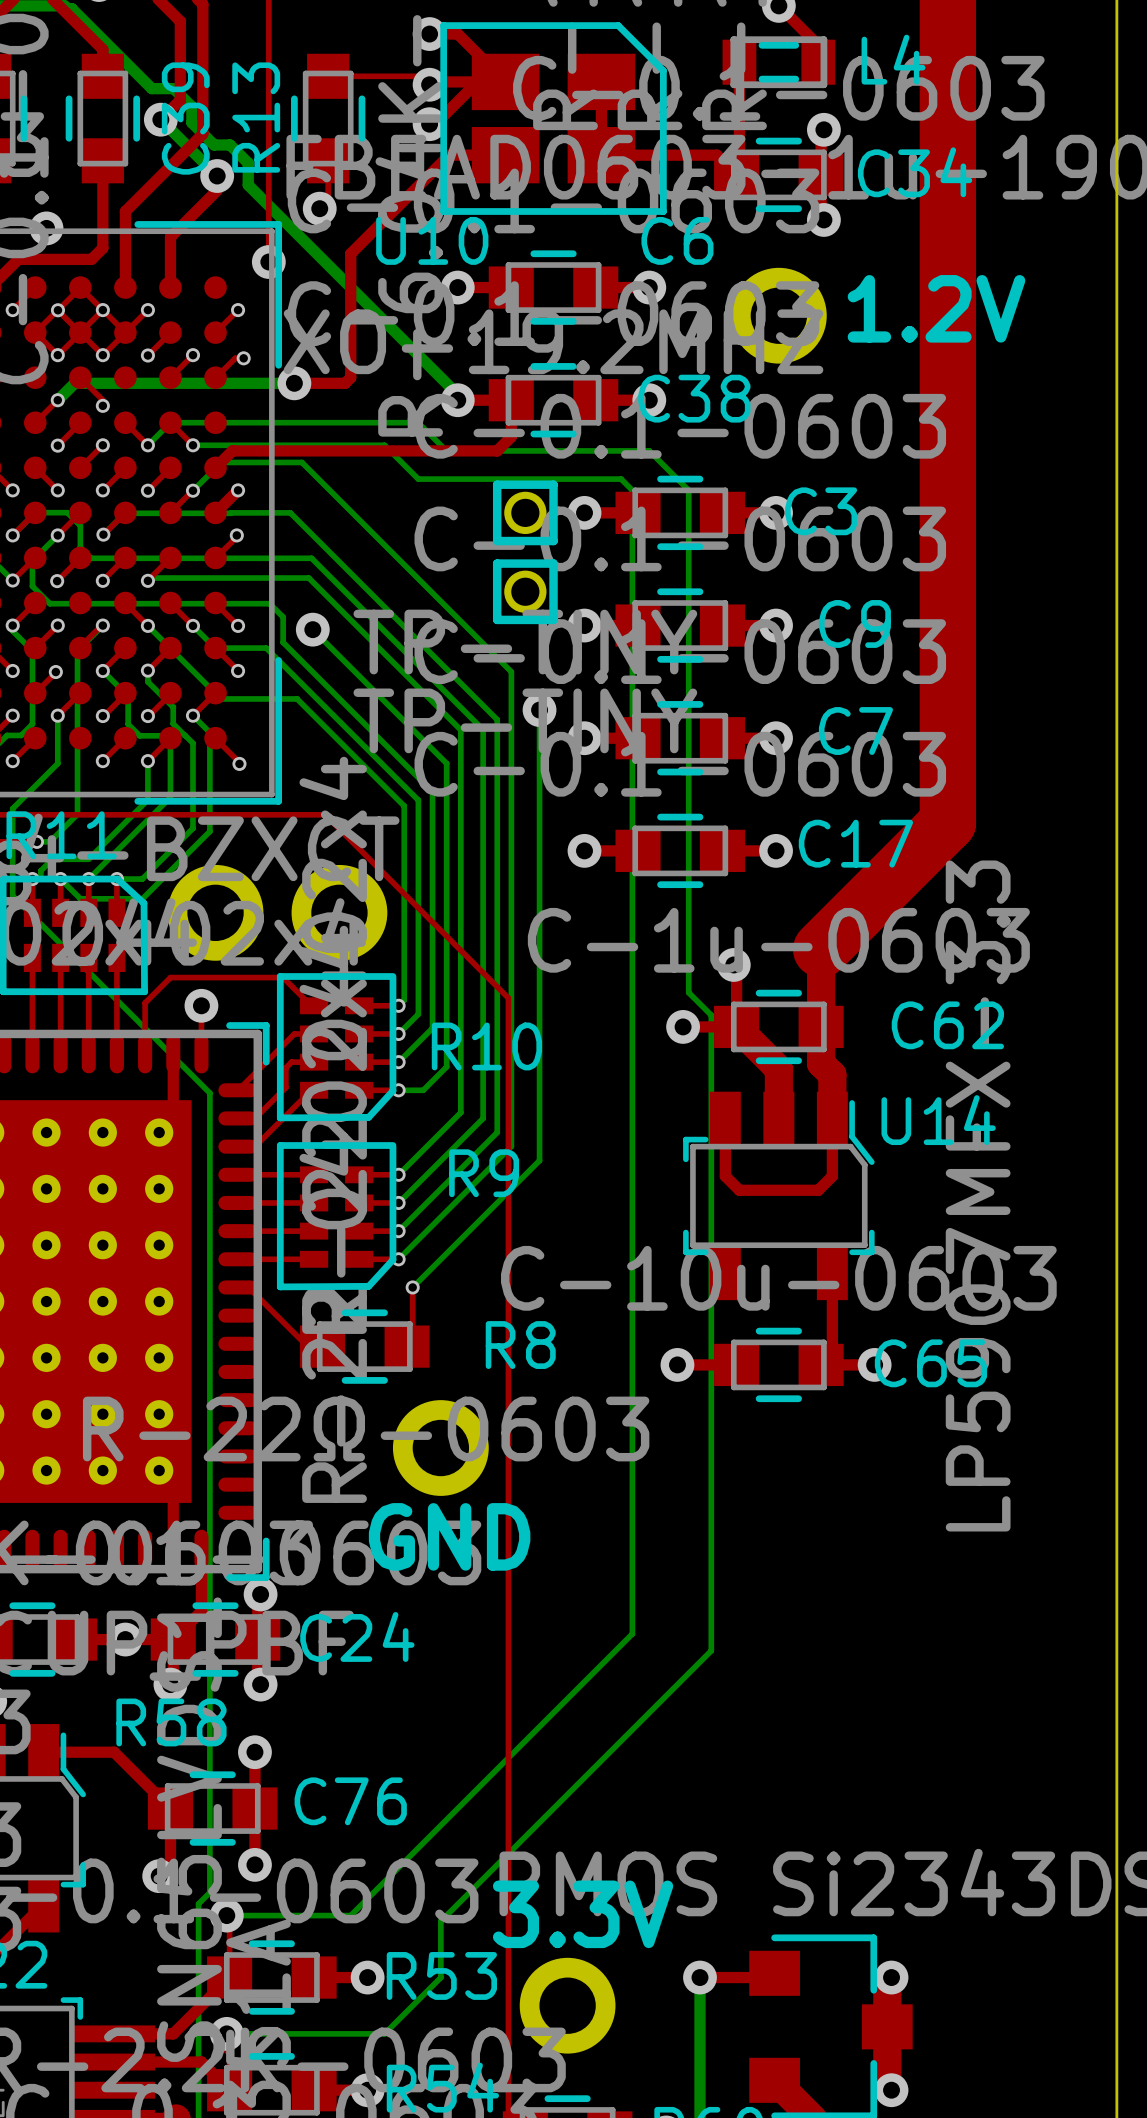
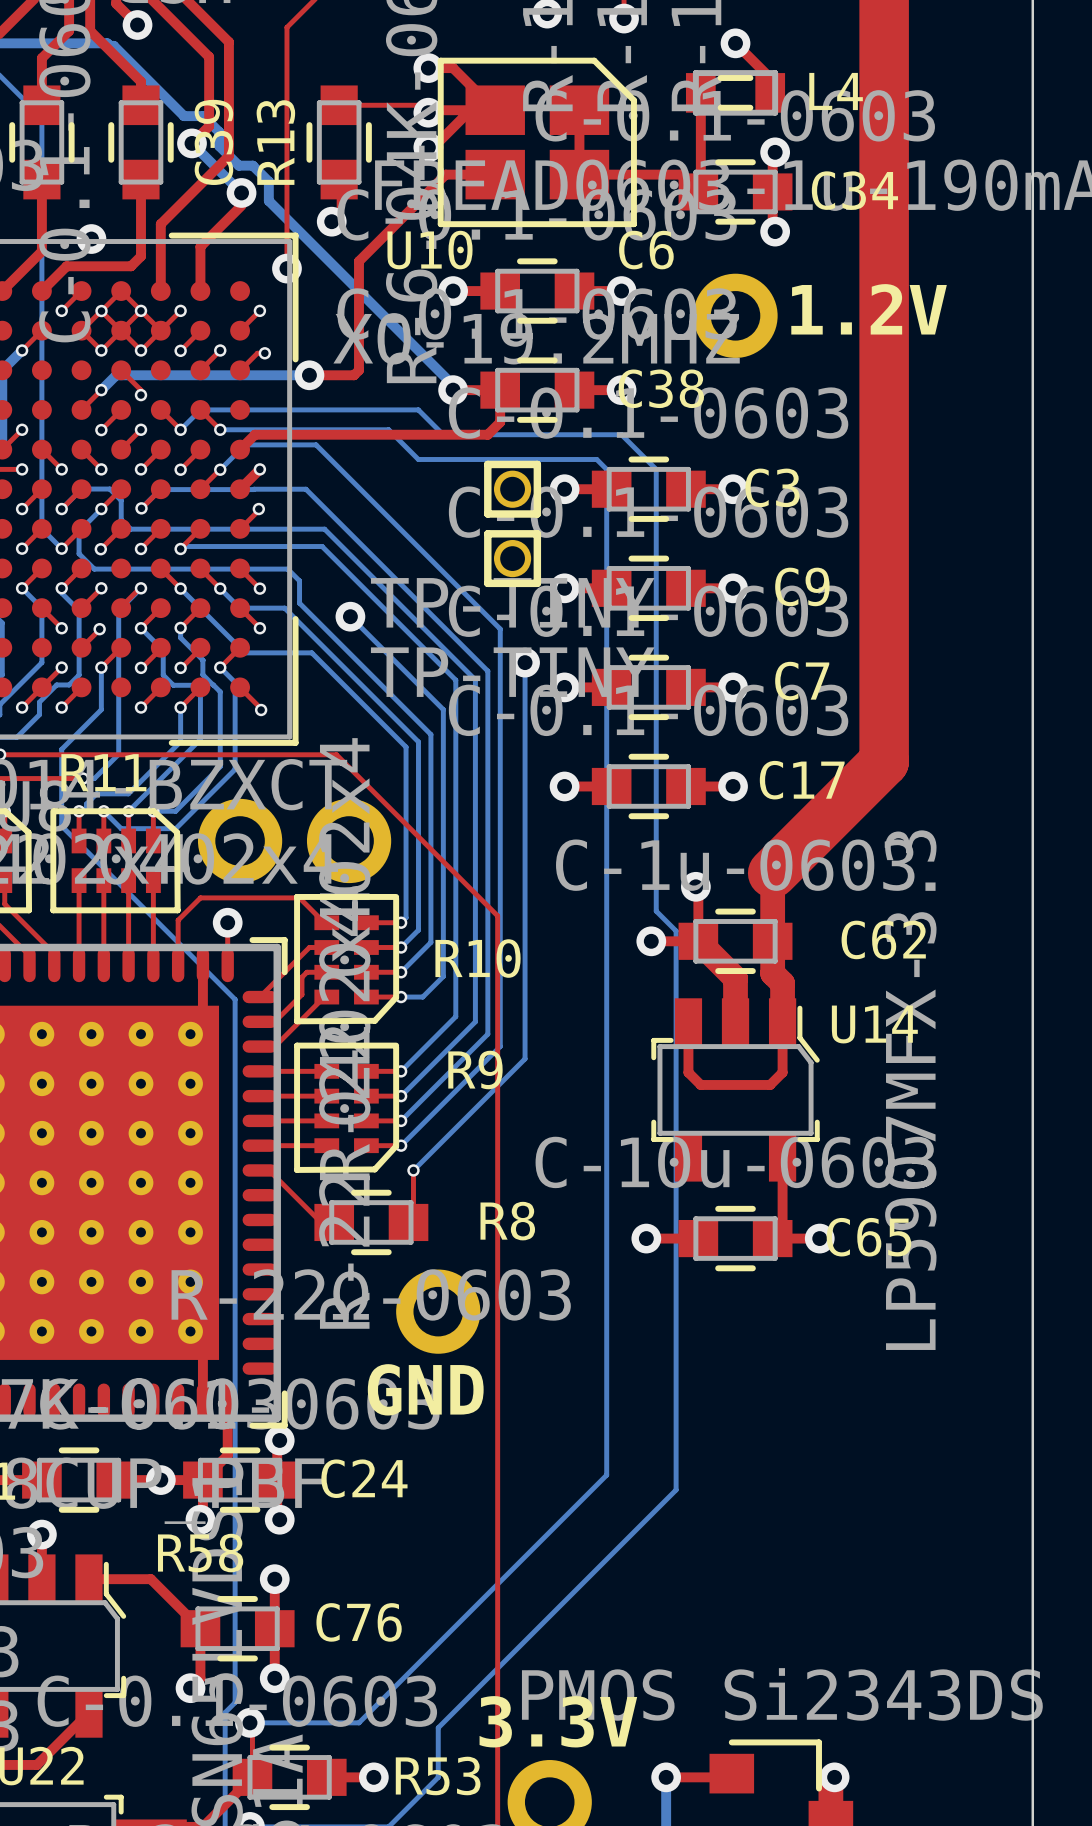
bottom track: (312, 629) (340, 657) -> none
via position: (312, 629) -> (350, 616)

